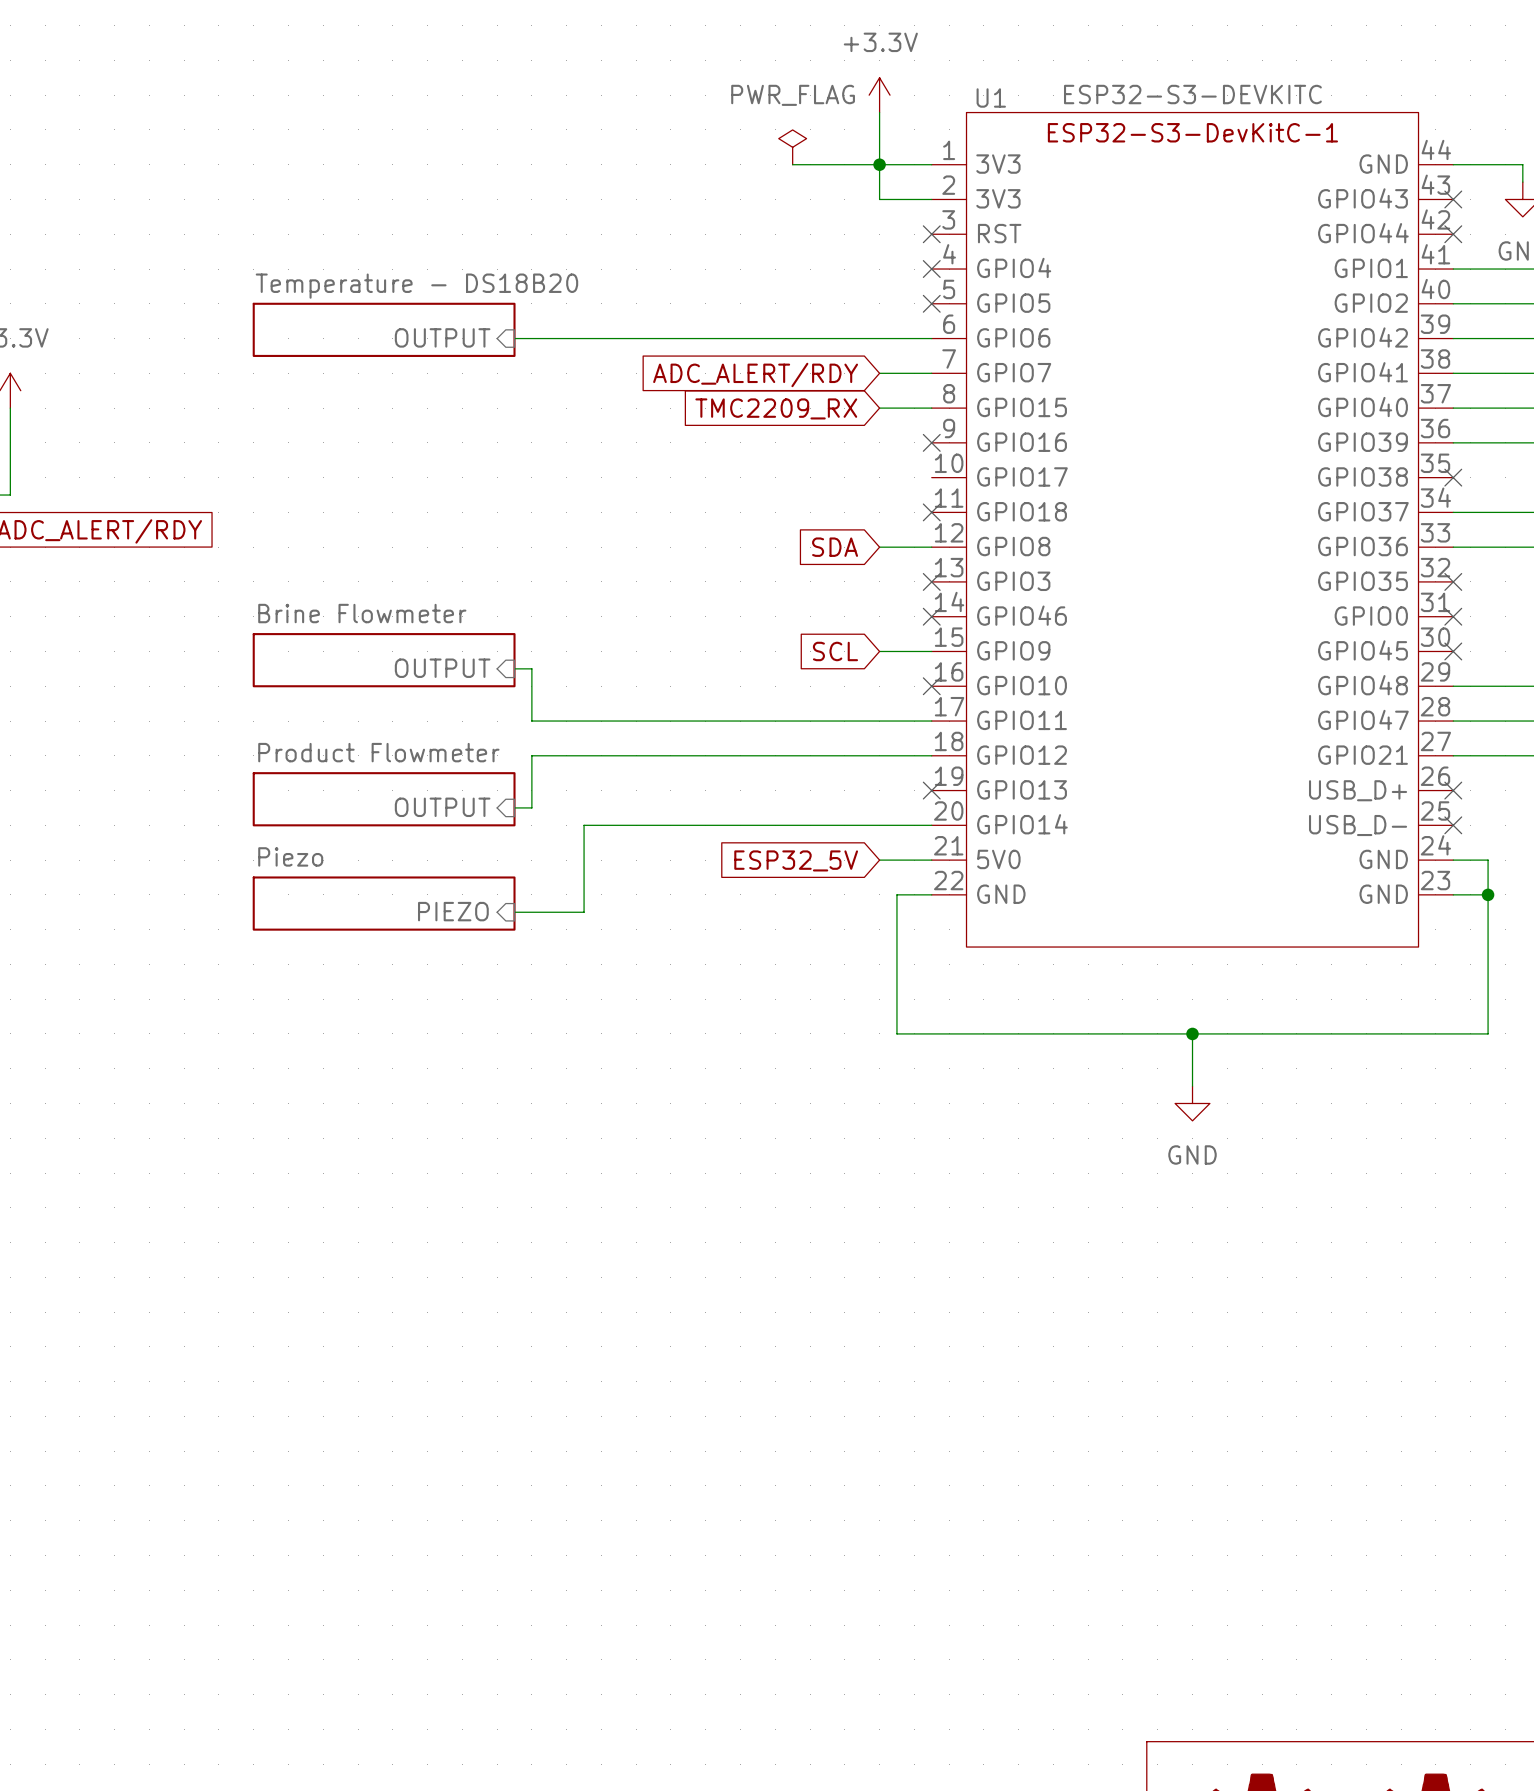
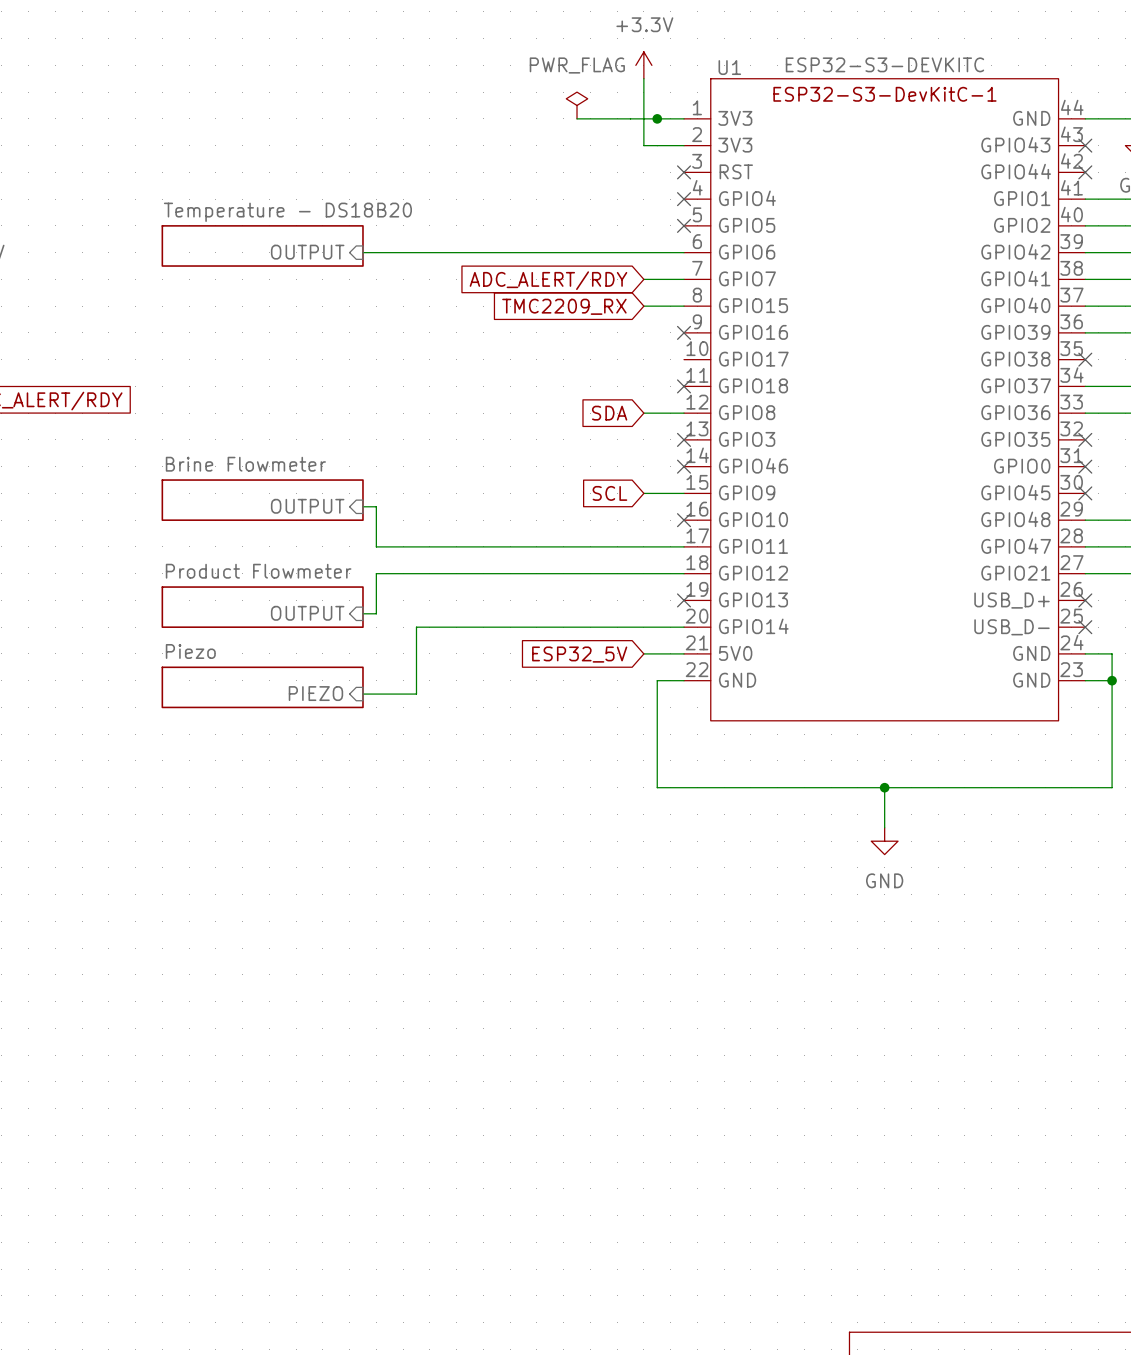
junction position: (879, 164) -> (657, 118)

